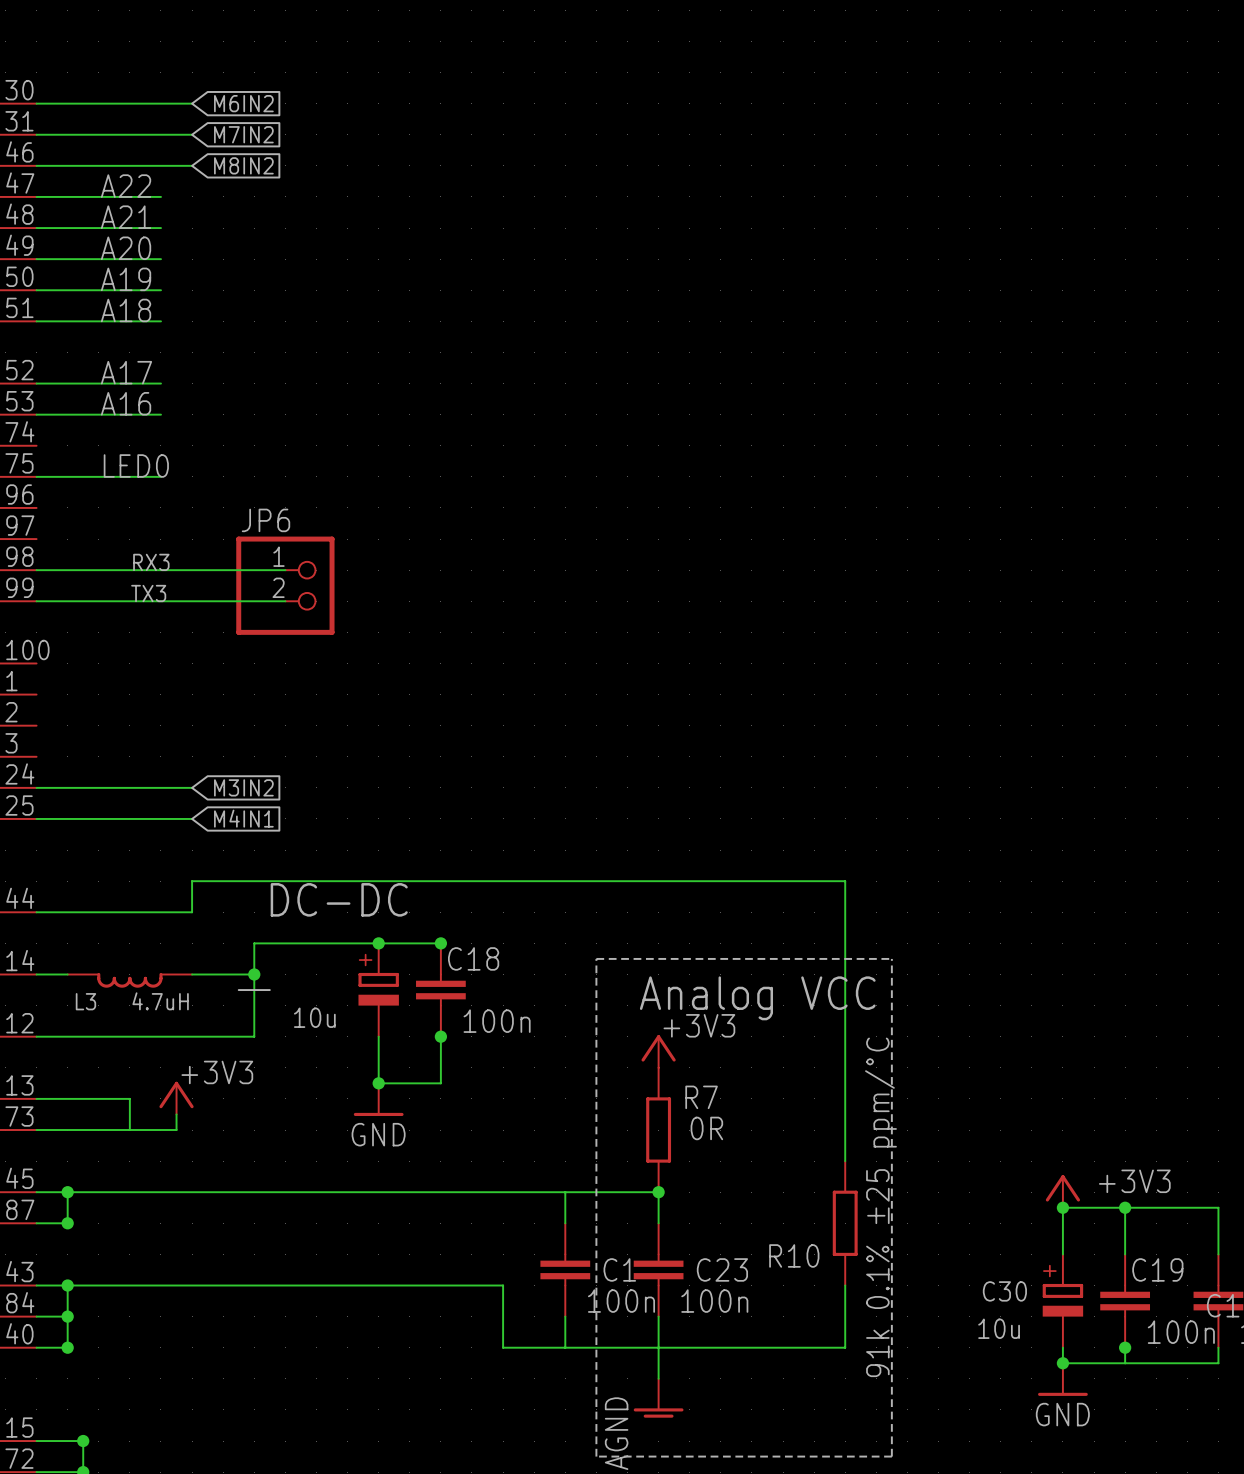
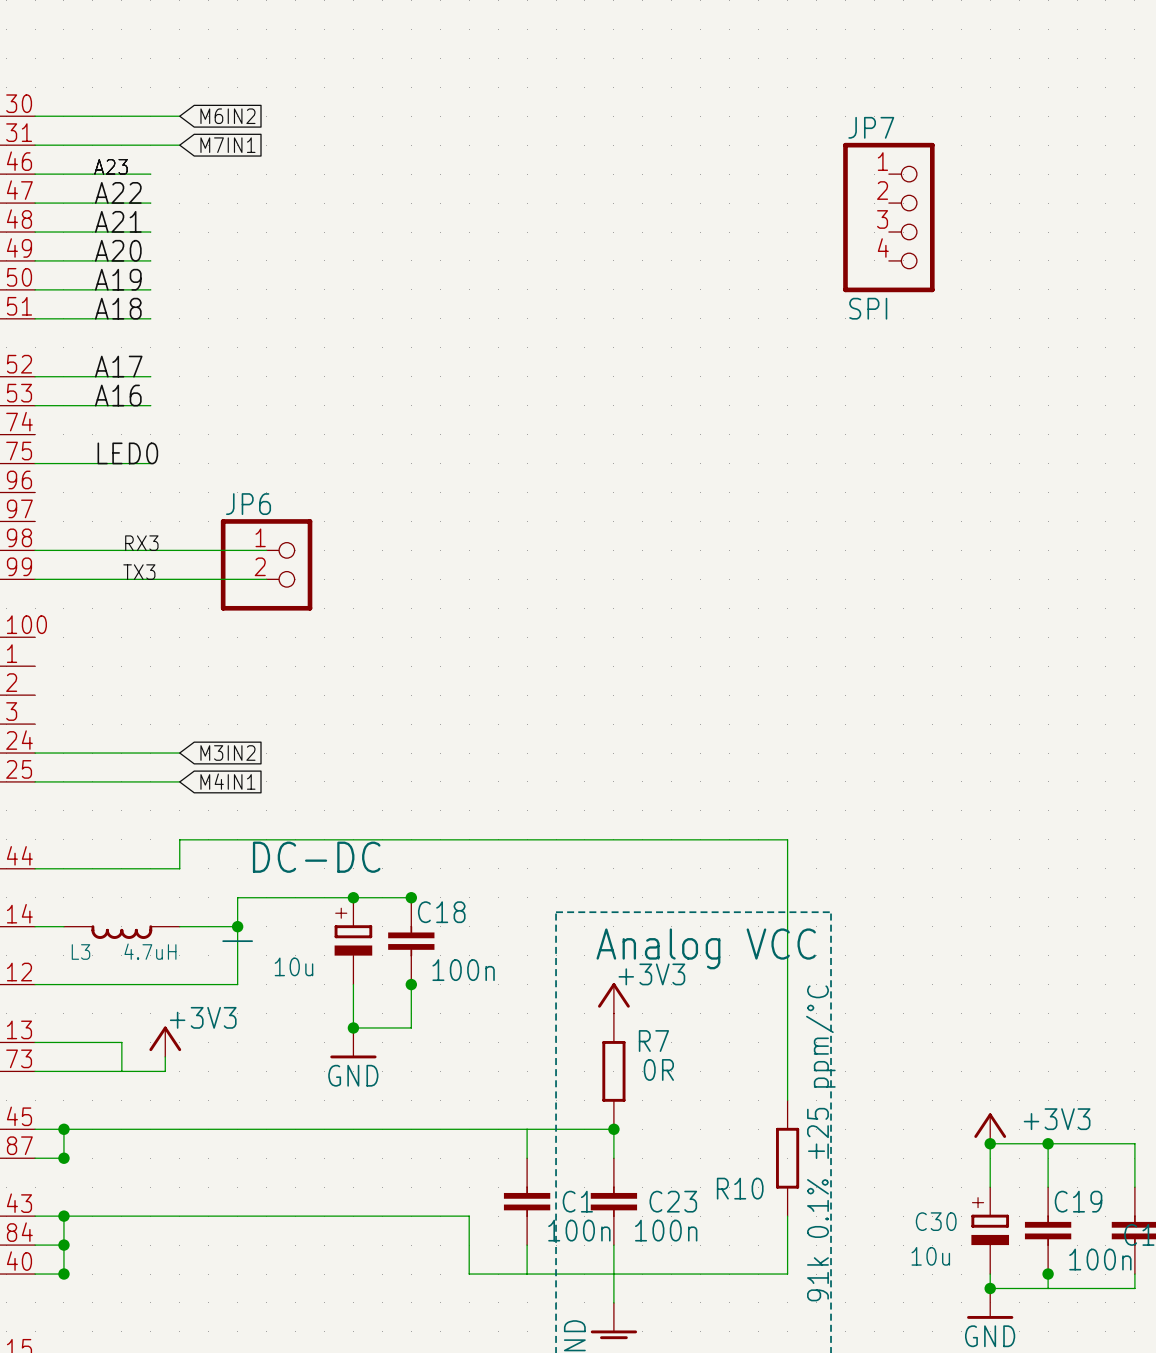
global label: M7IN2 (243, 134) -> M7IN1 (227, 145)
label: none -> A23 (111, 166)
wire: (160, 165) (192, 165) -> none
global label: M8IN2 (243, 165) -> none
JP7: none -> SPI (888, 217)

